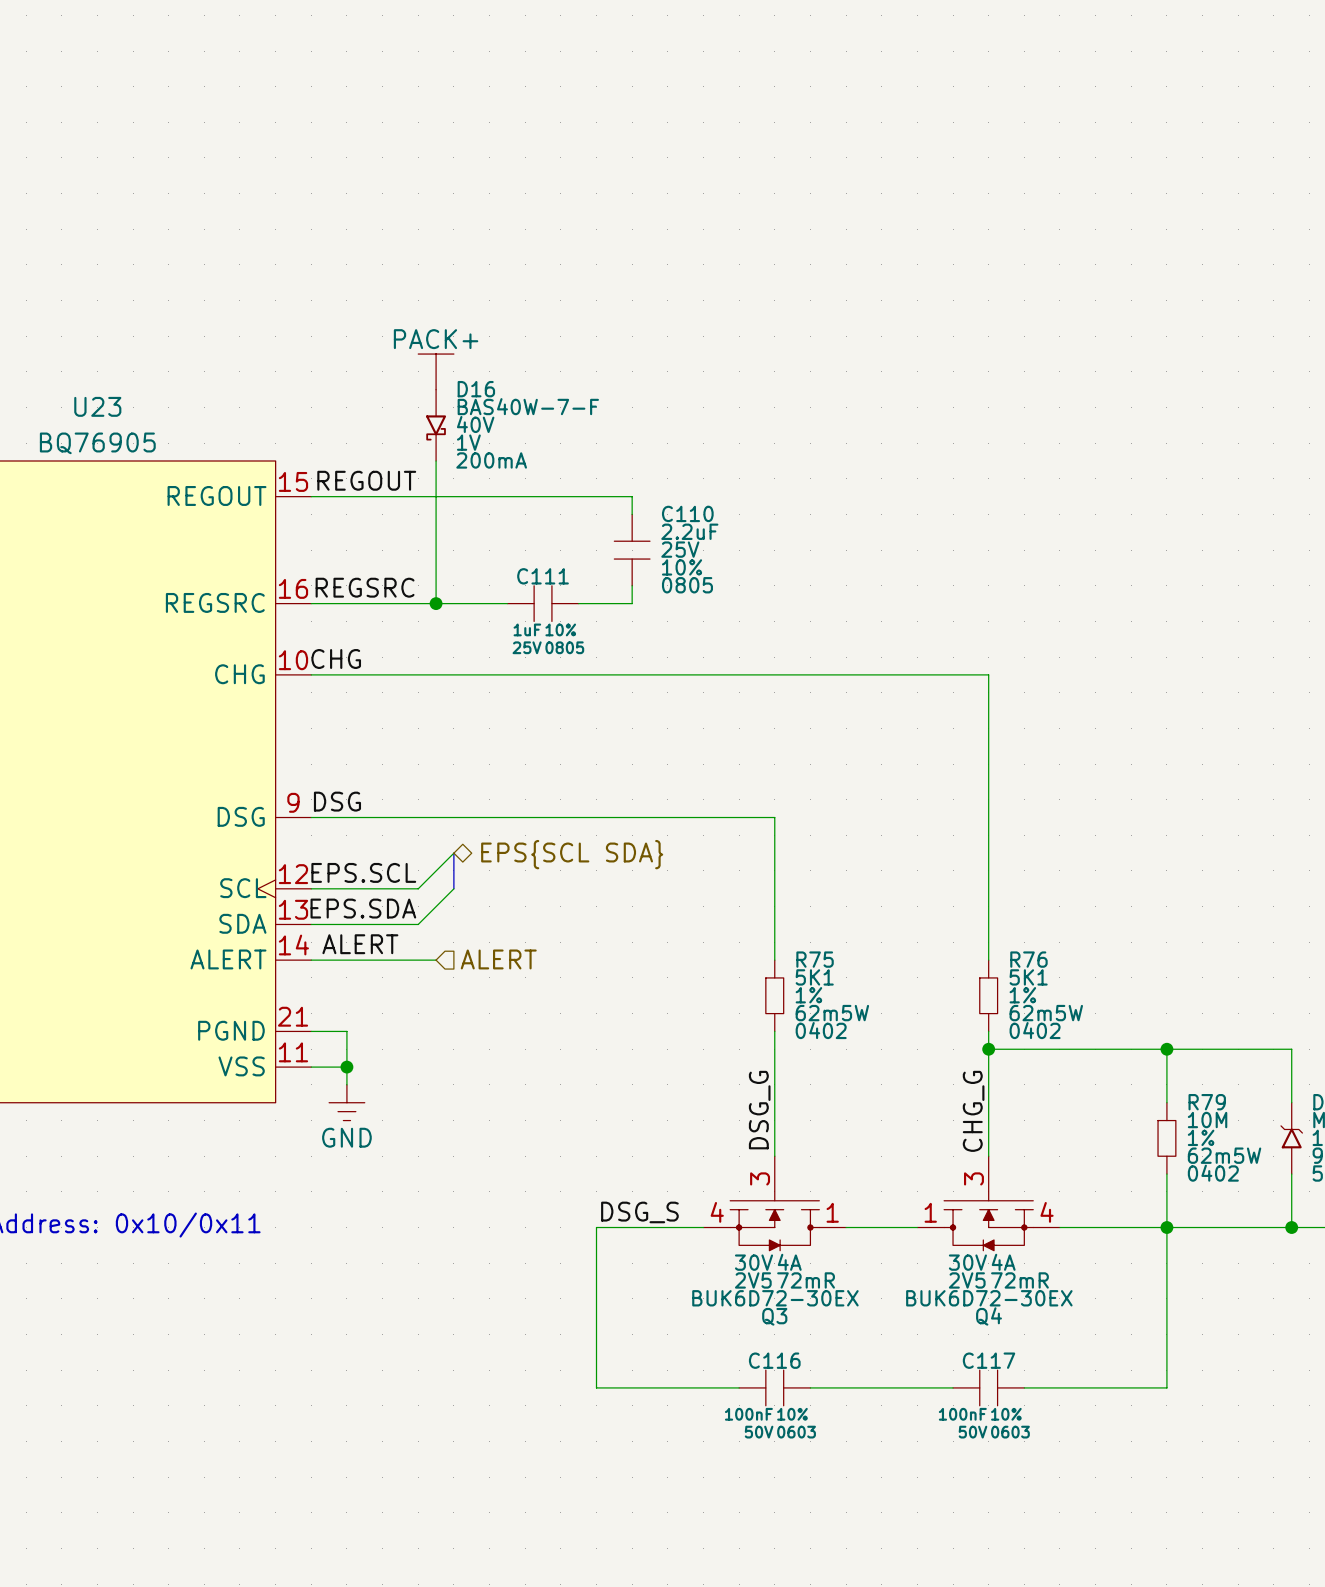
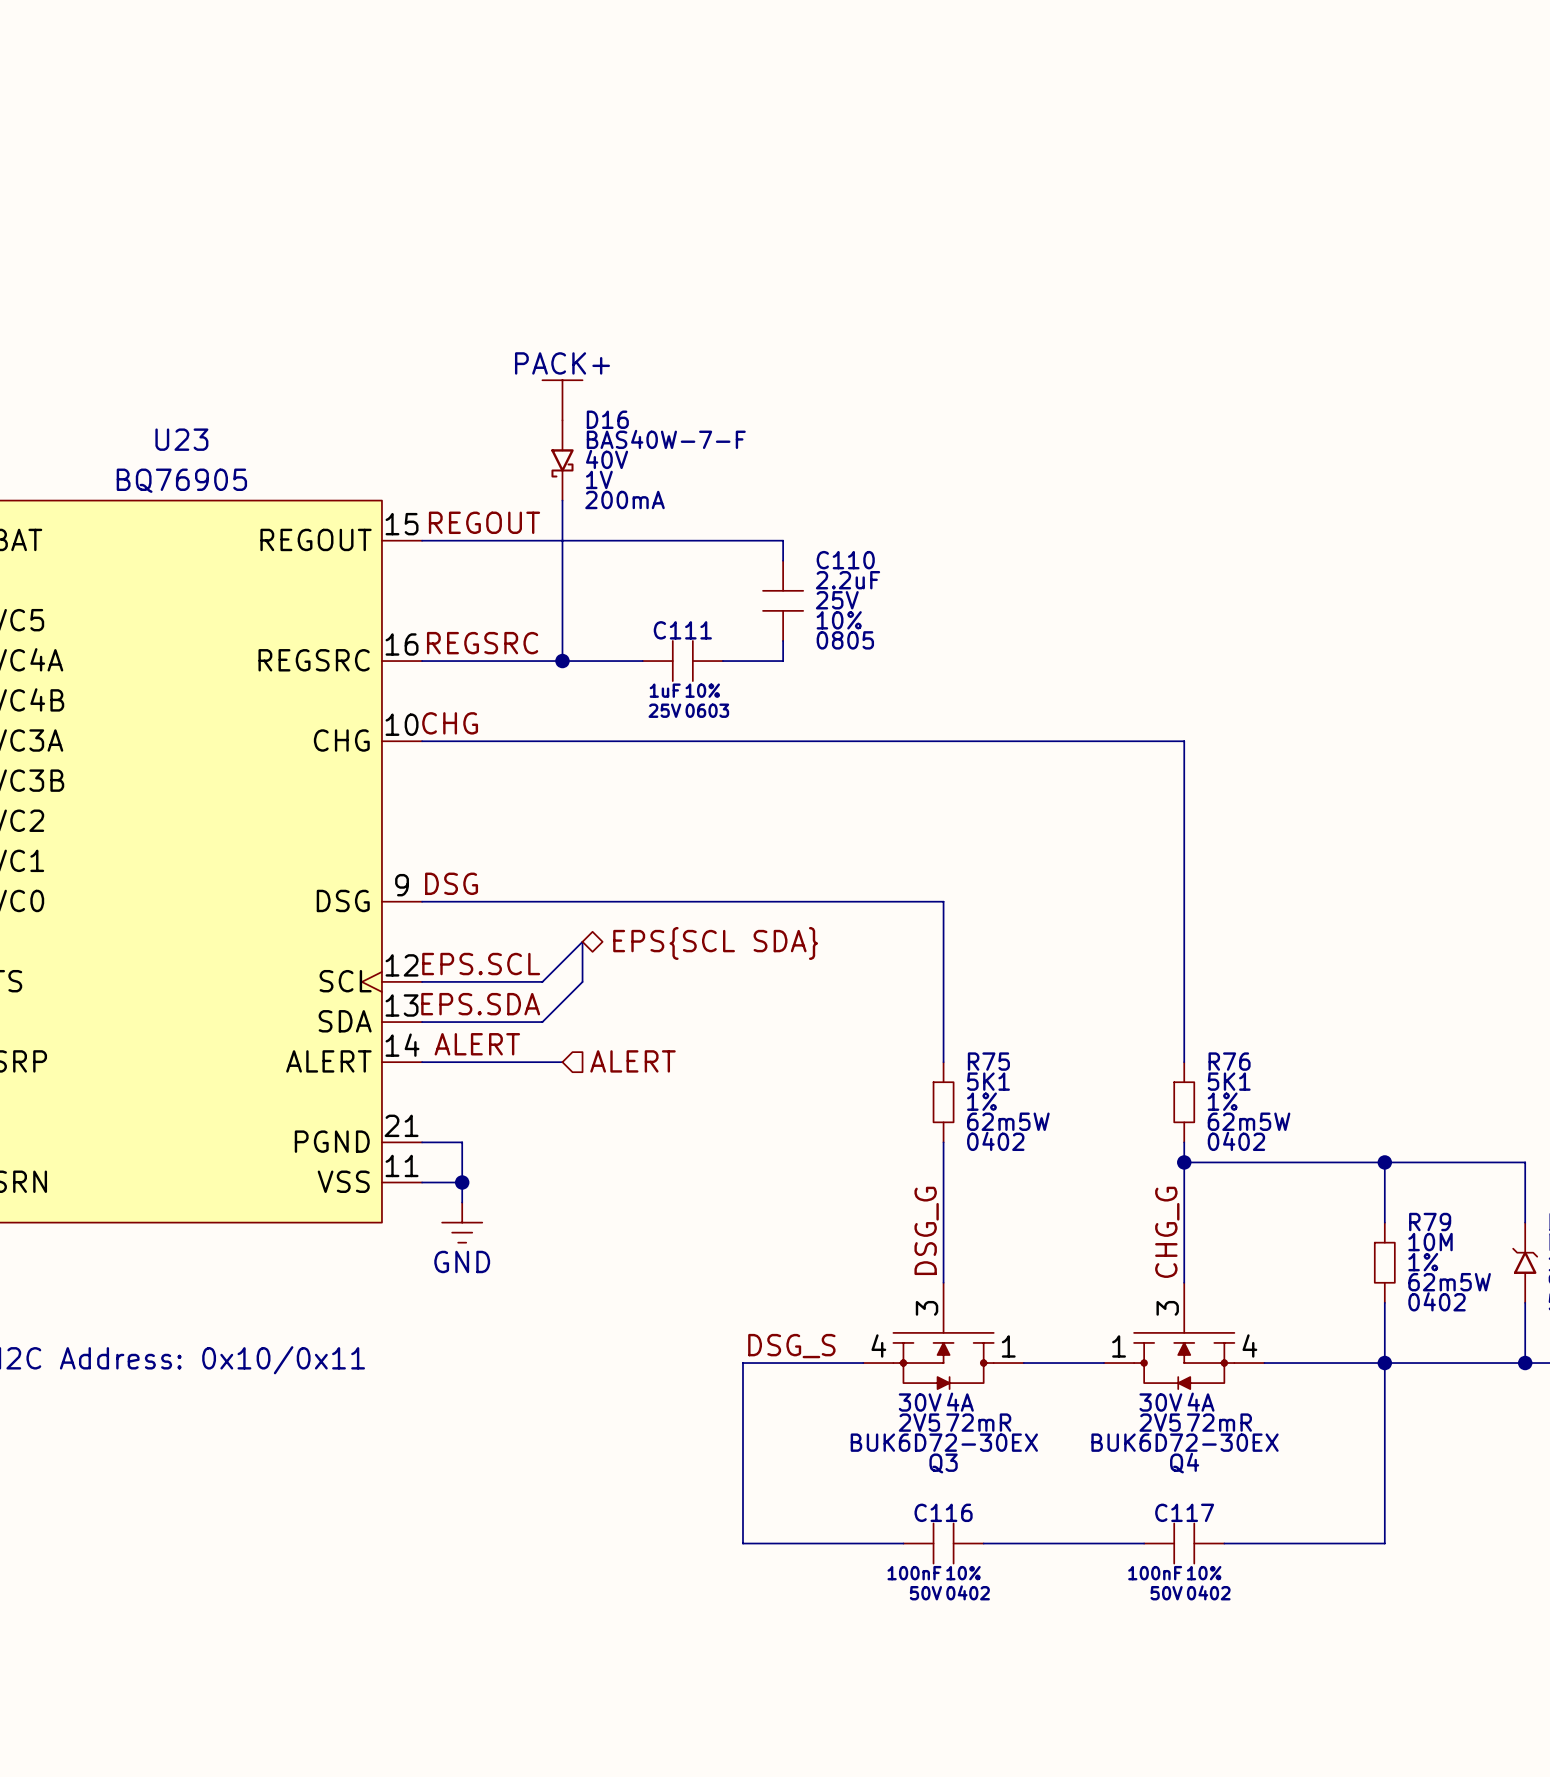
C111 text: 0805 (564, 647) -> 0603 (707, 710)
C116 text: 0603 (796, 1432) -> 0402 (968, 1592)
C117 text: 0603 (1010, 1432) -> 0402 (1208, 1592)

